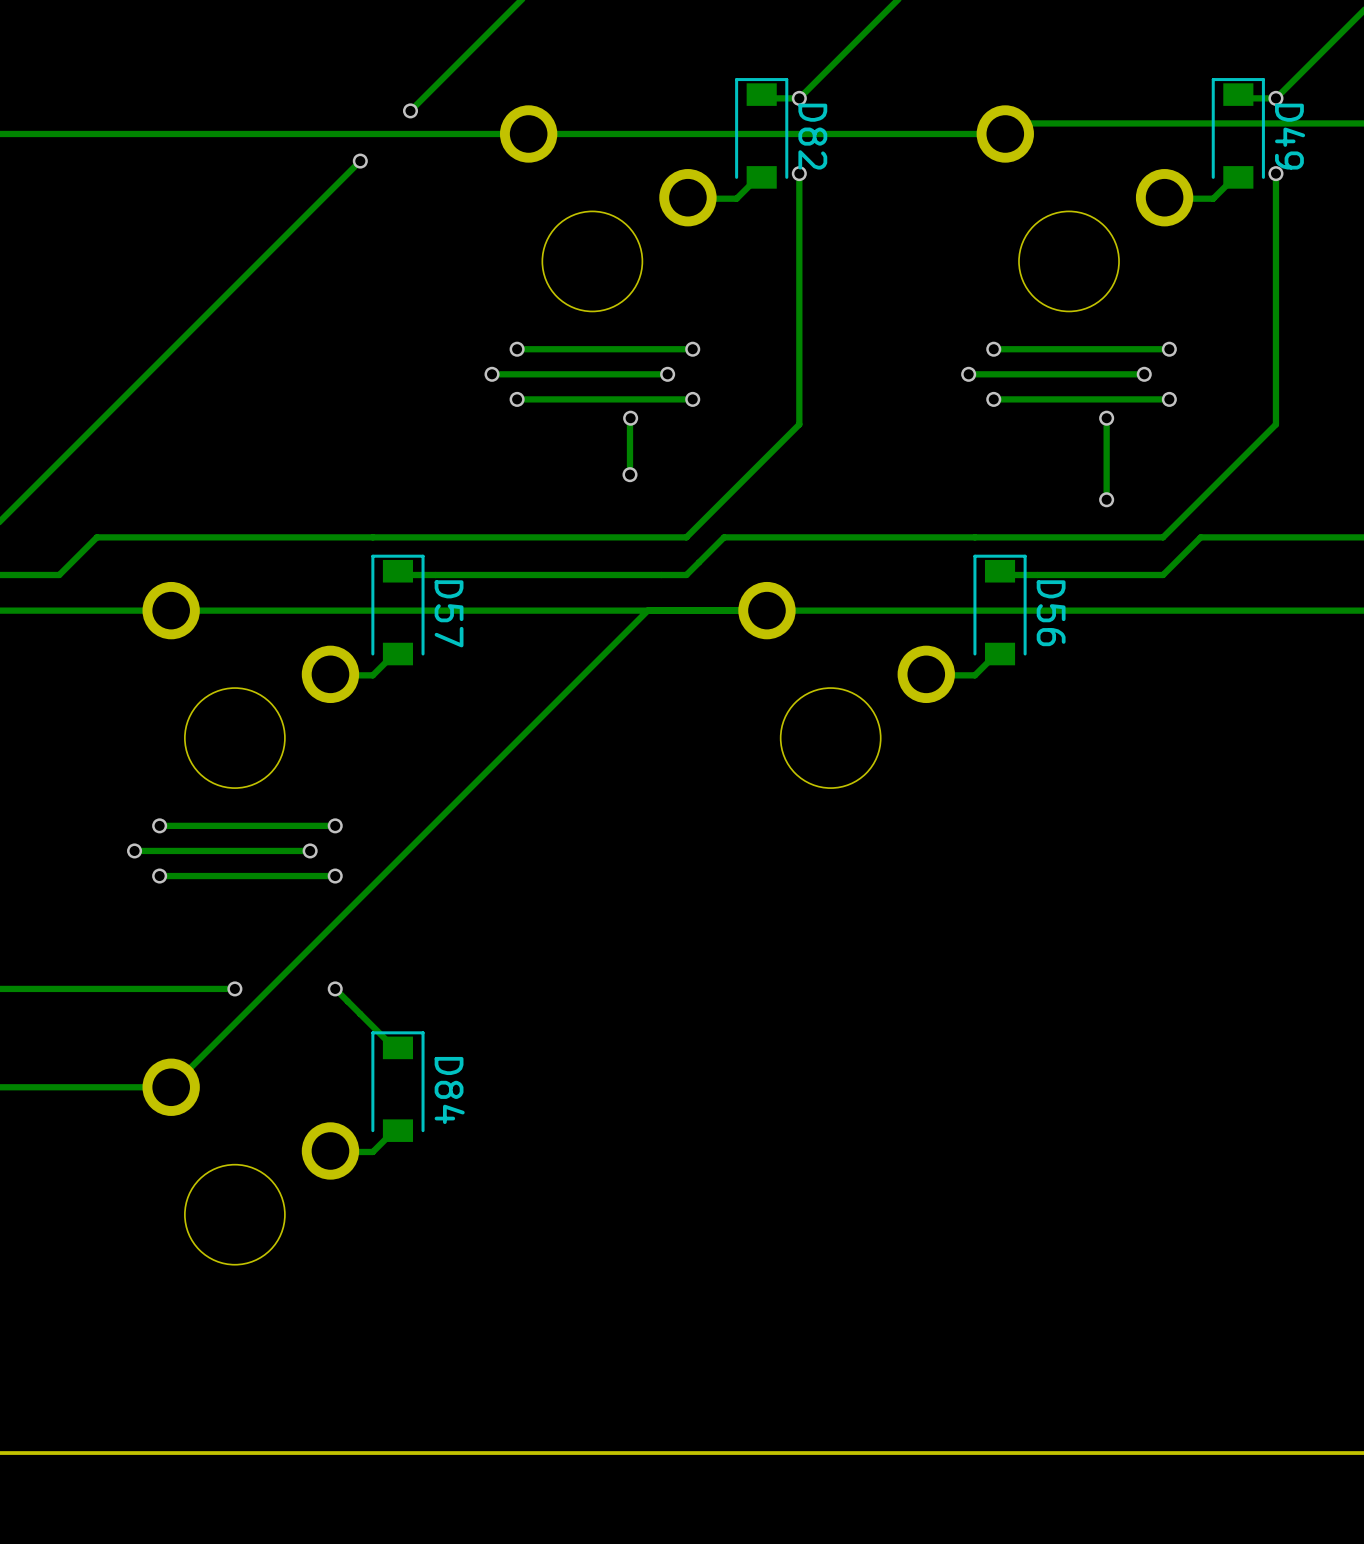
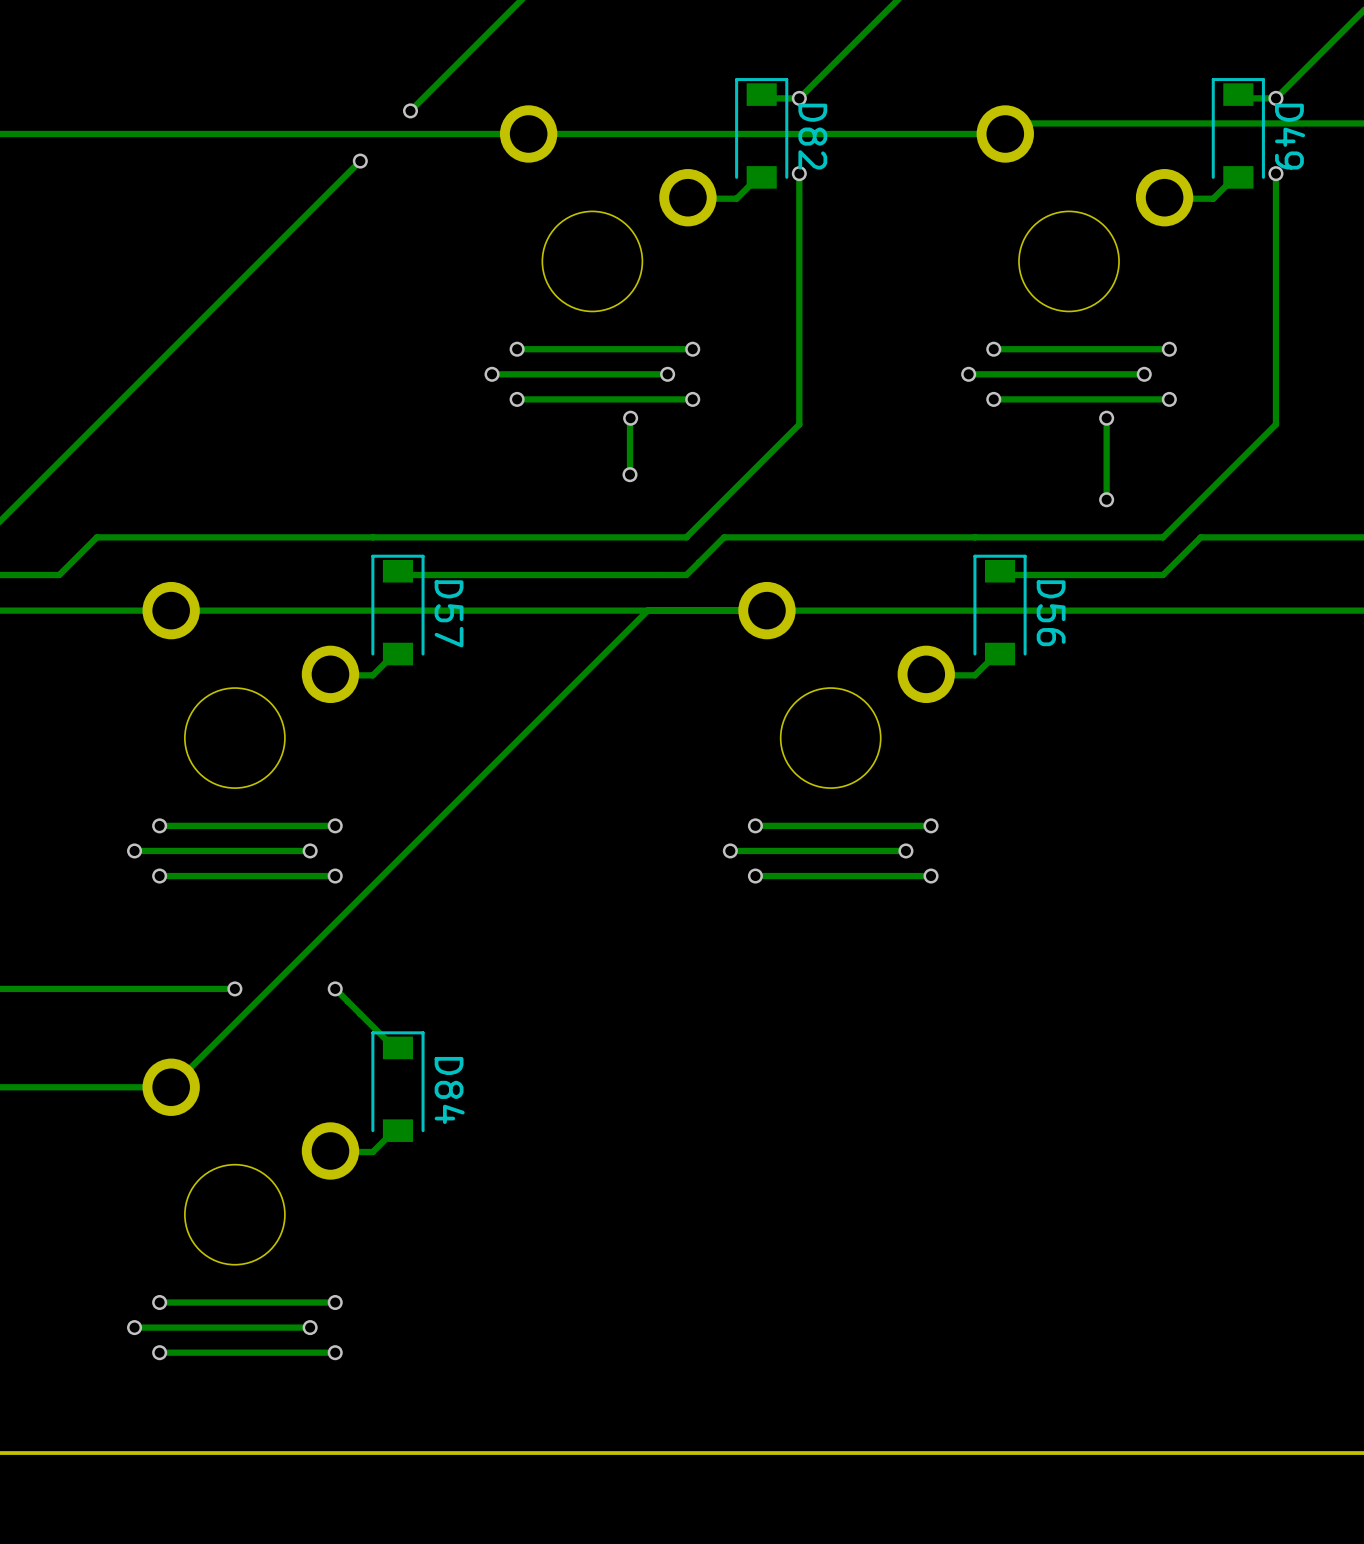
via: none -> (755, 825)
track: none -> (931, 825) (755, 825)
via: none -> (931, 825)
via: none -> (730, 850)
track: none -> (905, 850) (730, 850)
via: none -> (905, 850)
via: none -> (755, 876)
track: none -> (931, 876) (755, 876)
via: none -> (931, 876)
via: none -> (159, 1302)
track: none -> (335, 1302) (159, 1302)
via: none -> (335, 1302)
via: none -> (134, 1327)
track: none -> (310, 1327) (134, 1327)
via: none -> (310, 1327)
via: none -> (159, 1352)
track: none -> (335, 1352) (159, 1352)
via: none -> (335, 1352)

